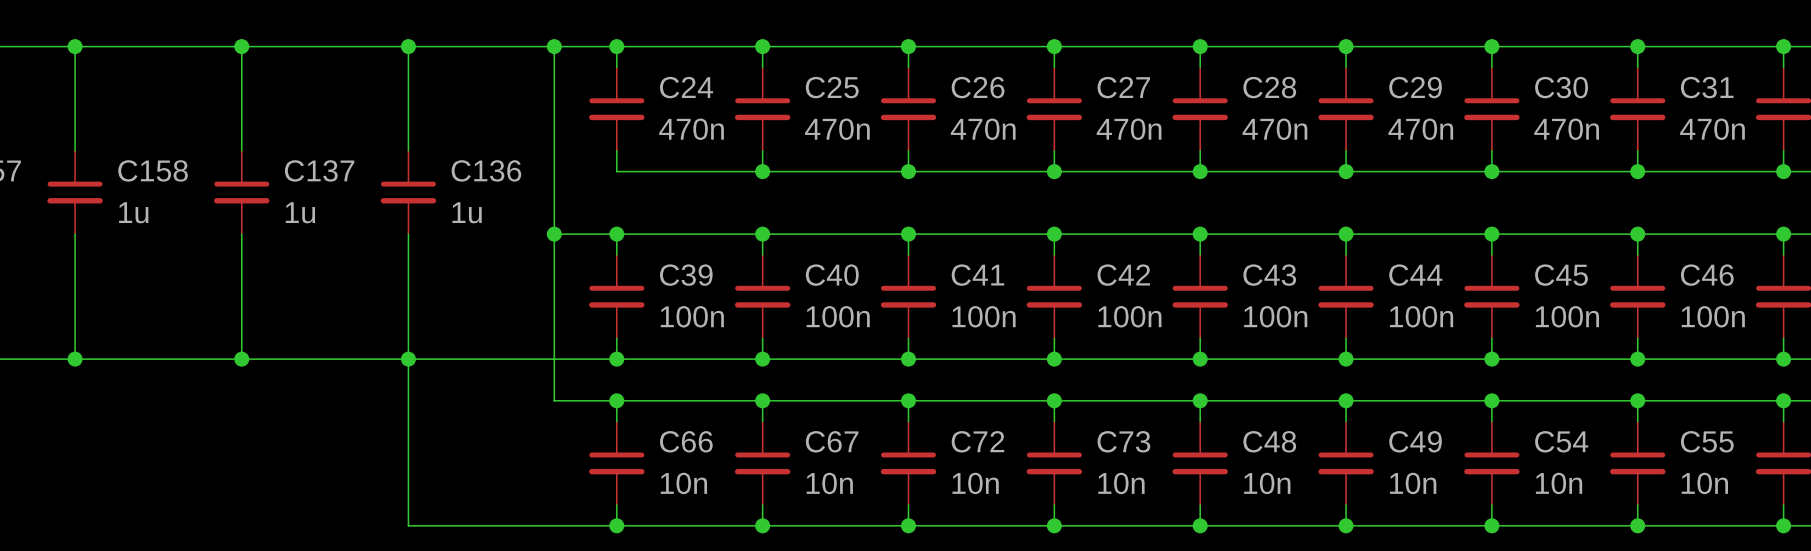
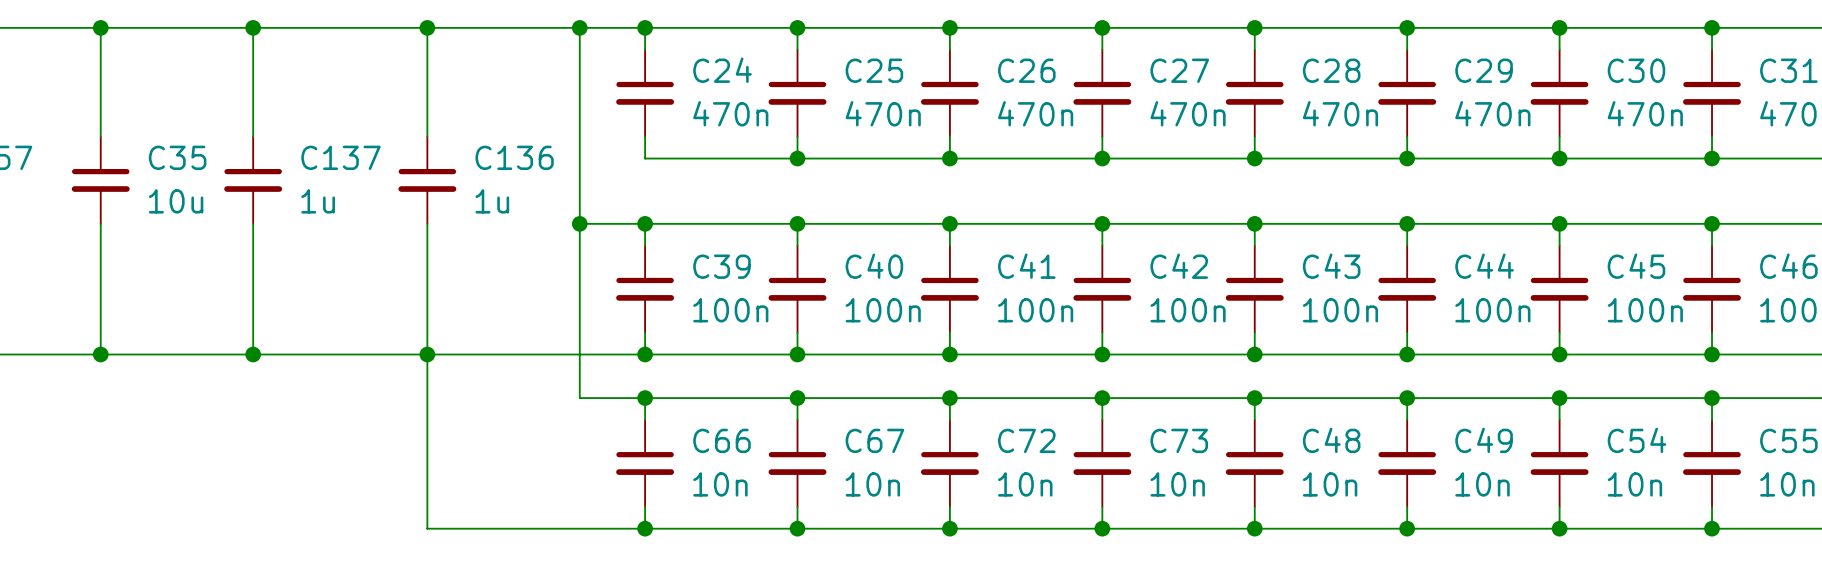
wire: (75, 46) (75, 150) -> (100, 27) (100, 136)
junction position: (75, 46) -> (100, 27)
C158: 1u (75, 192) -> none
C35: none -> 10u (100, 180)
wire: (75, 234) (75, 359) -> (100, 223) (100, 354)
junction position: (75, 359) -> (100, 354)

